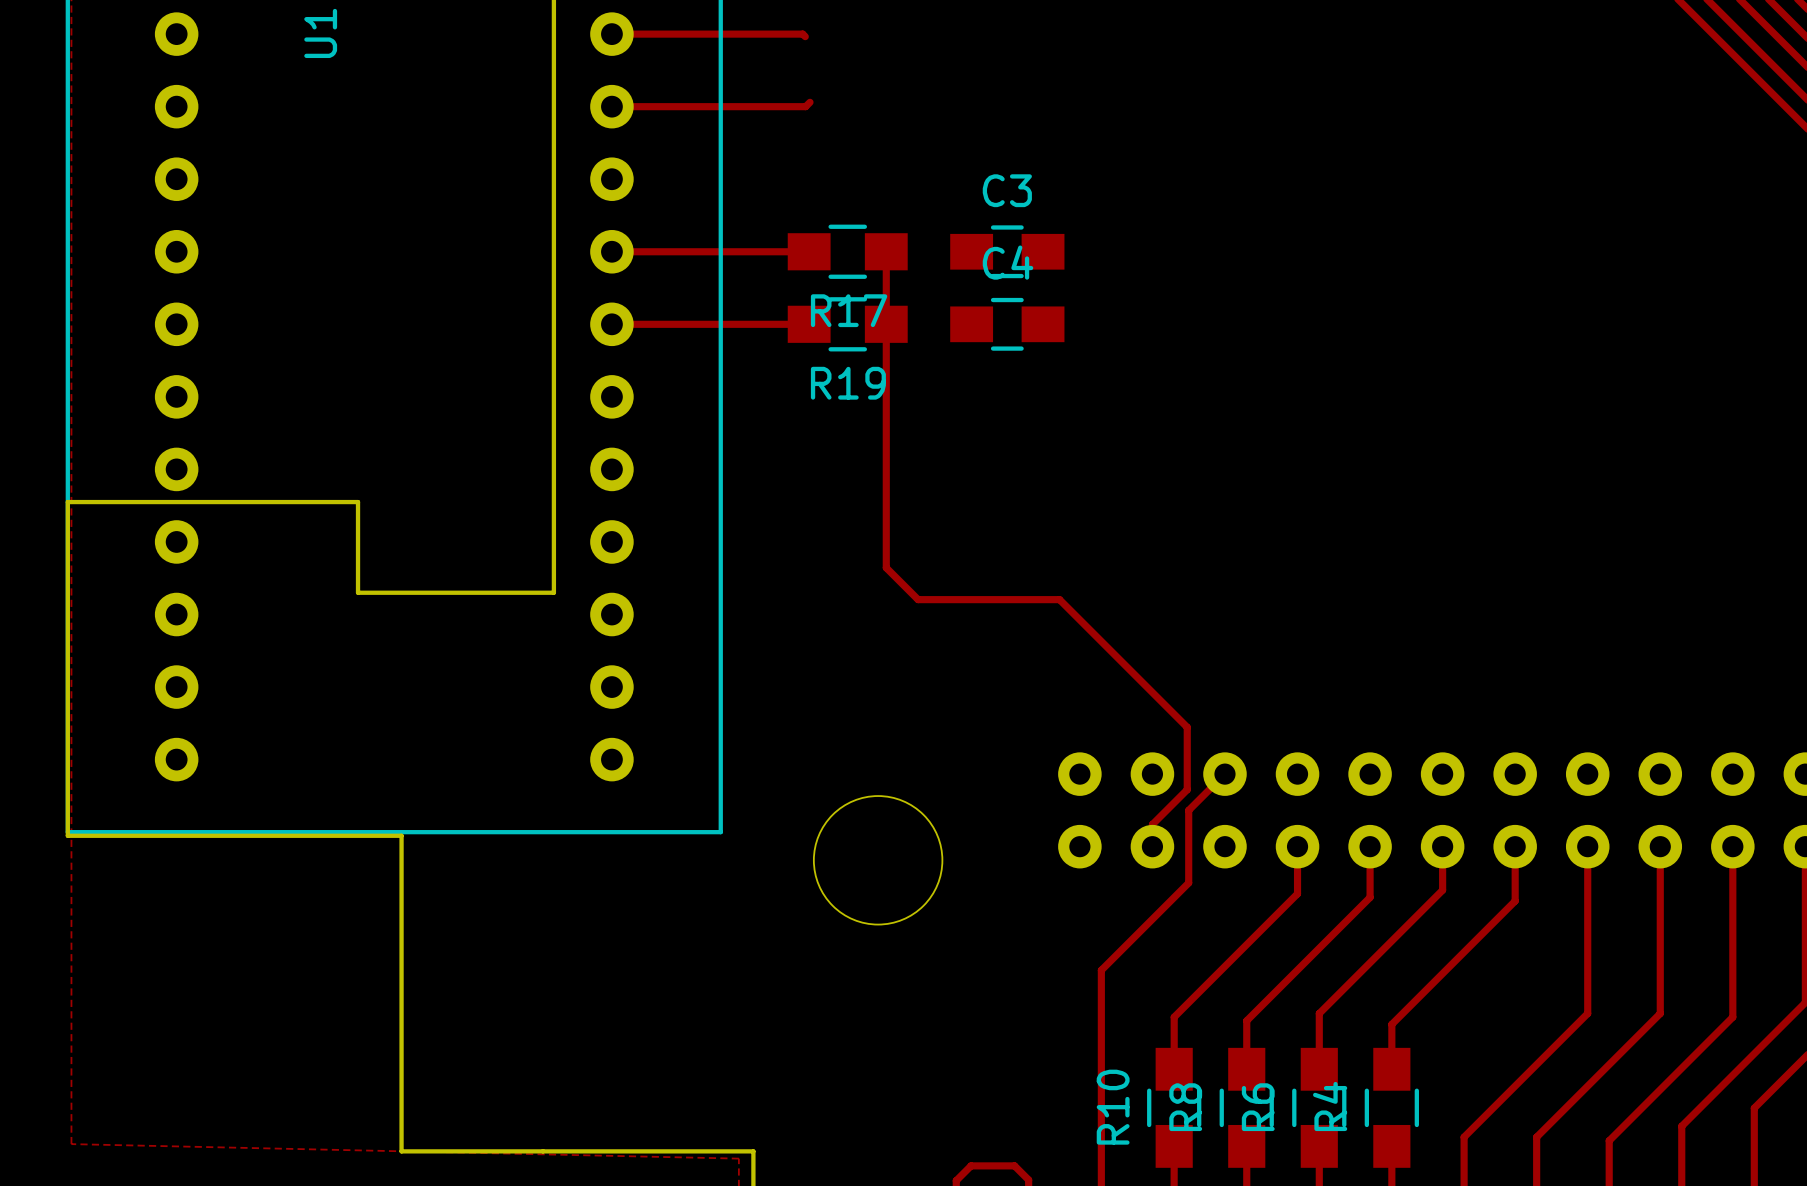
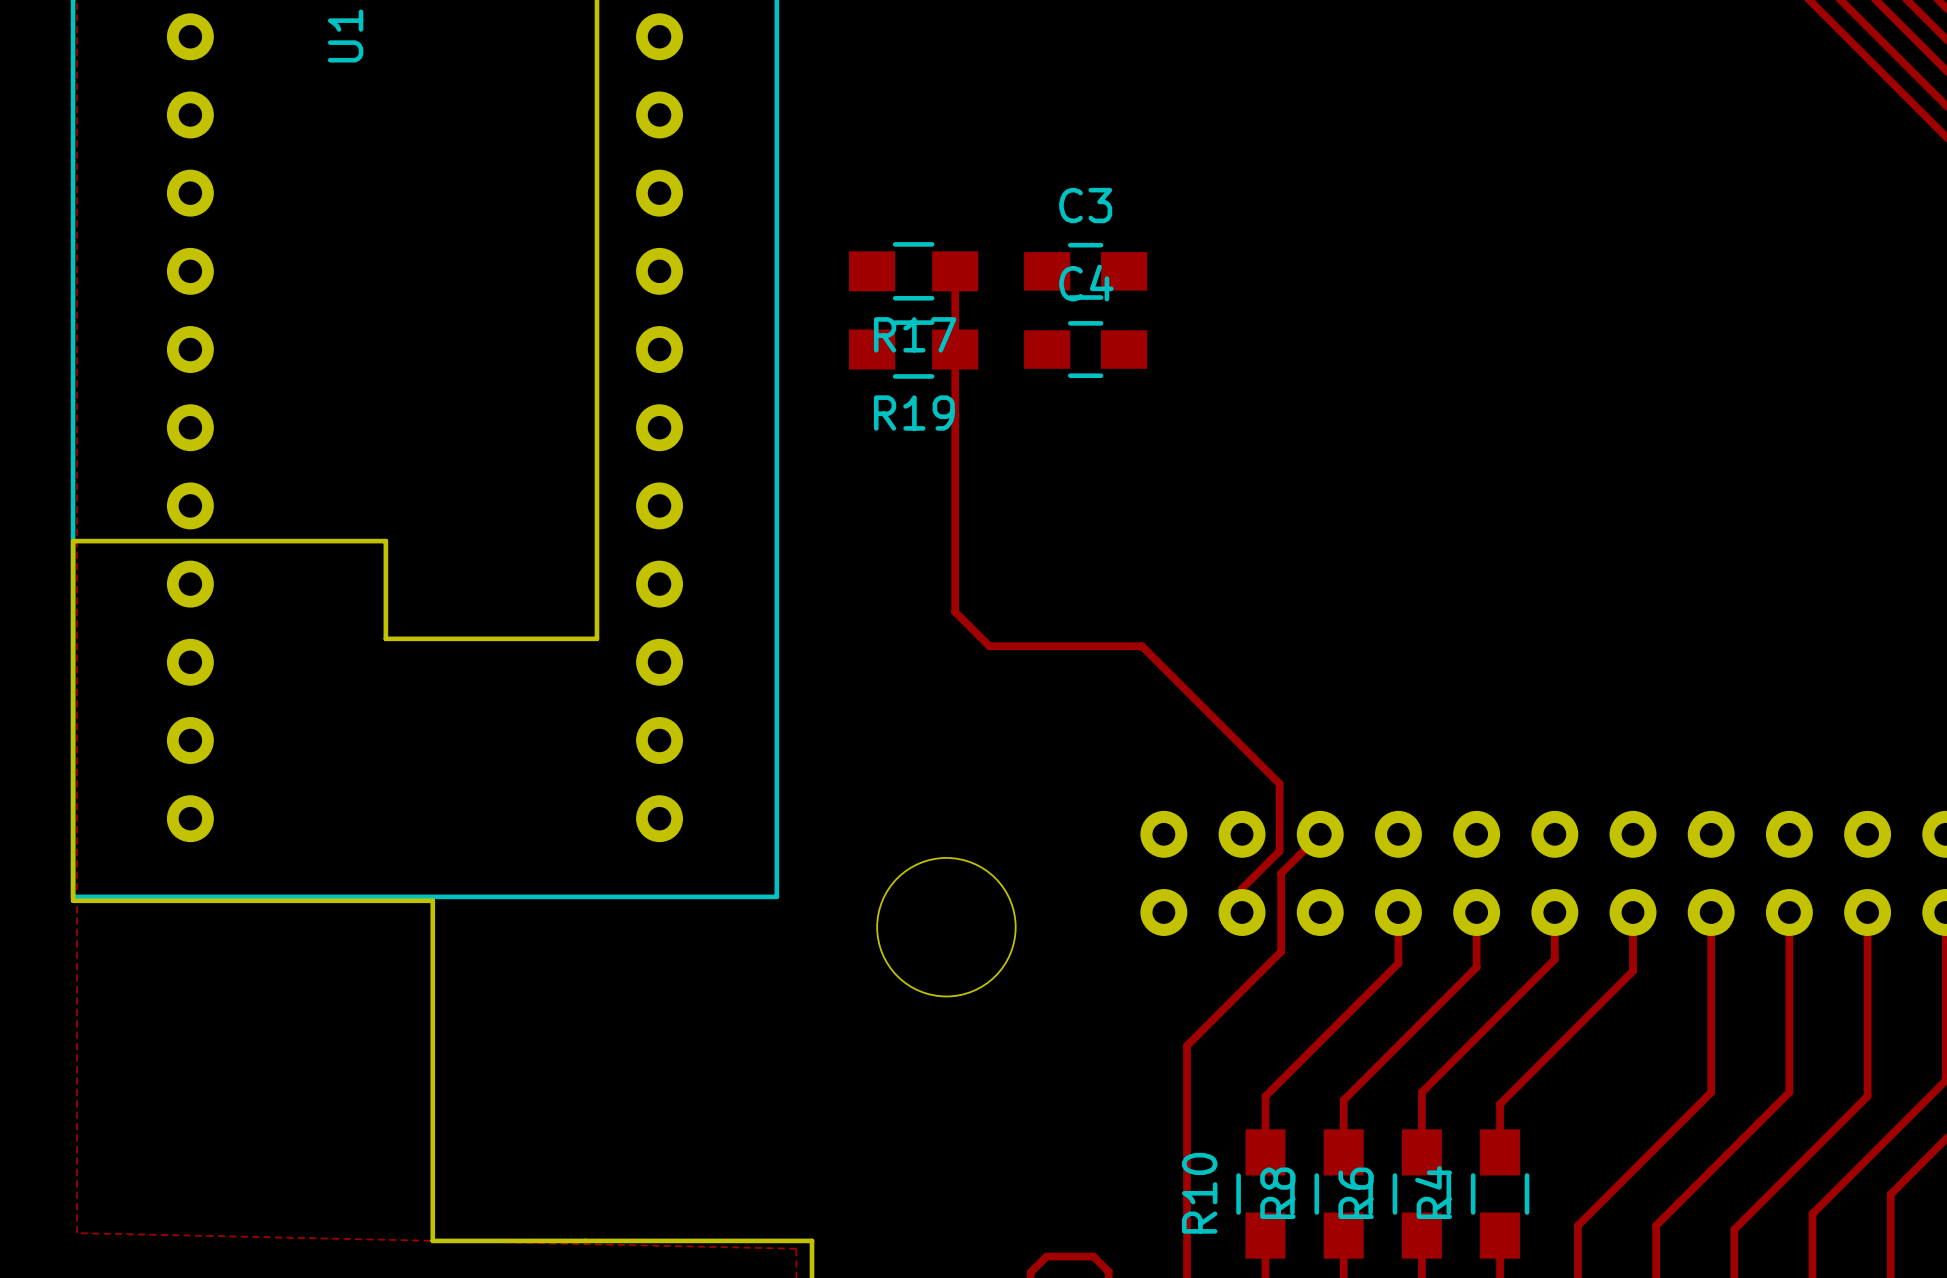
track: (611, 34) (802, 34) (805, 36) -> none
track: (810, 102) (805, 106) (611, 106) -> none
track: (611, 251) (809, 251) -> none
track: (611, 324) (809, 324) -> none

